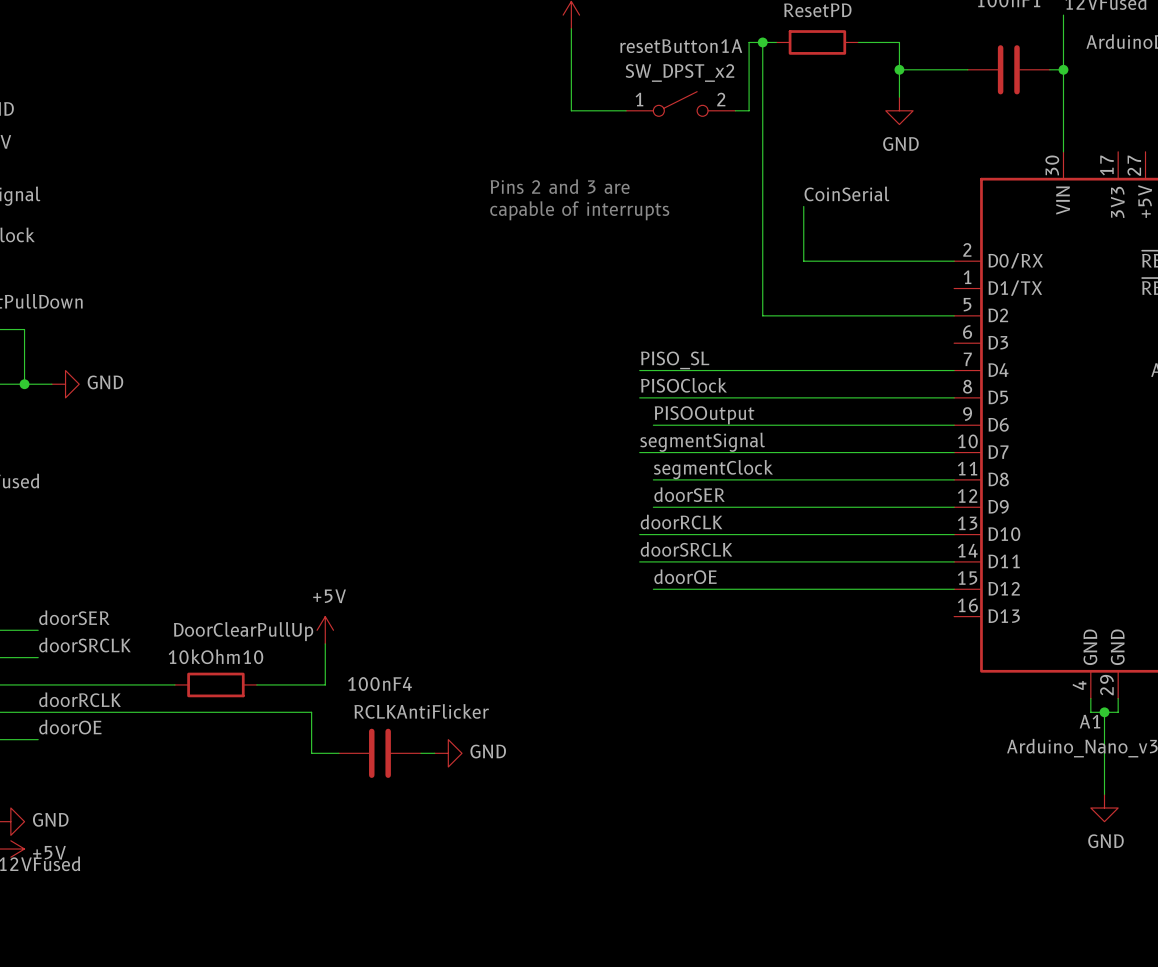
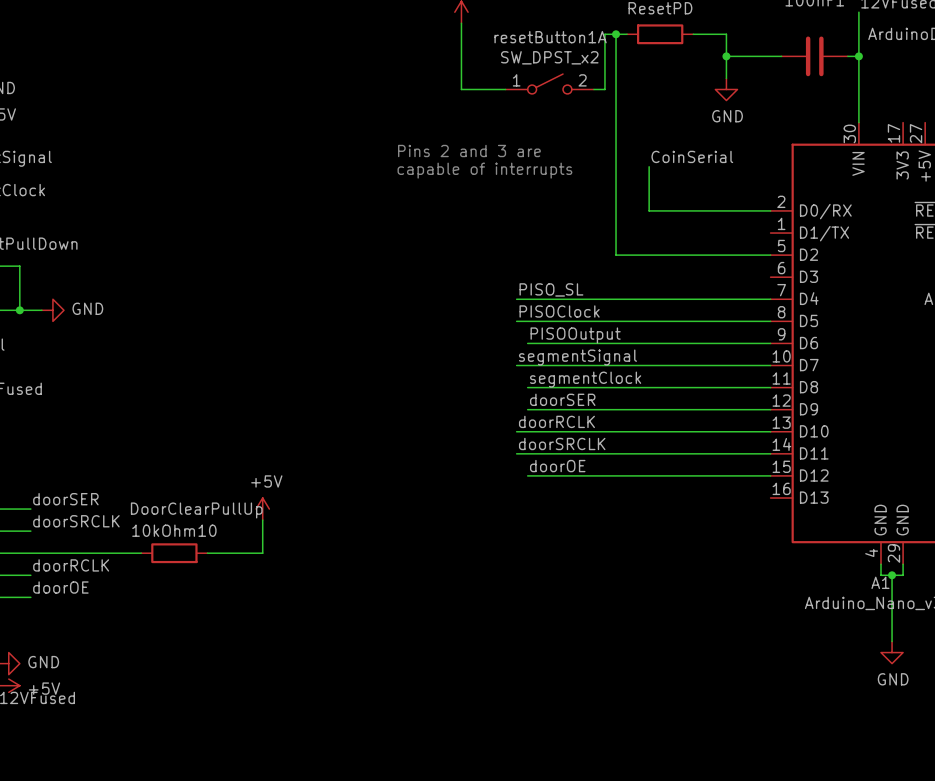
wire: (38, 712) (311, 712) (311, 753) (338, 753) -> none
100nF4: RCLKAntiFlicker (379, 753) -> none
wire: (420, 753) (434, 753) -> none
power symbol: GND (448, 753) -> none

